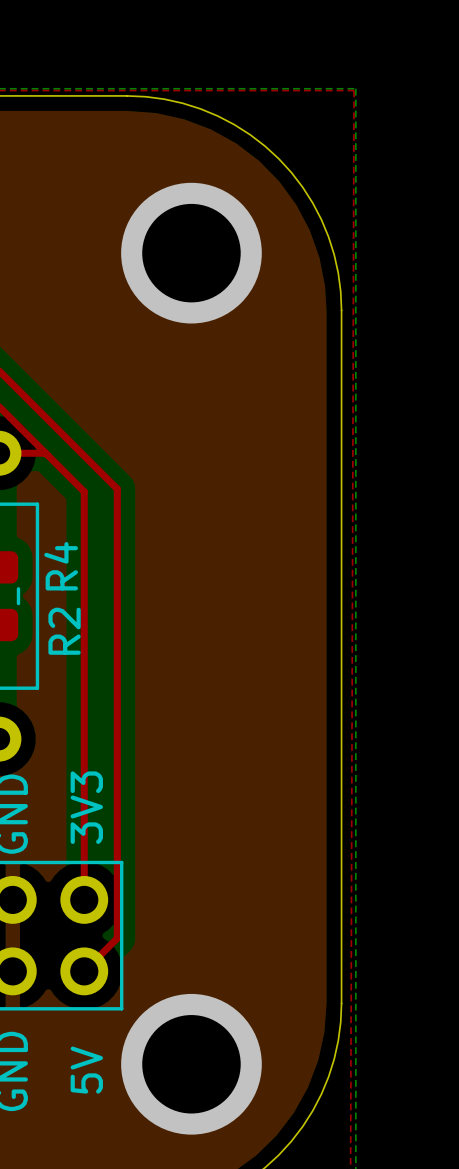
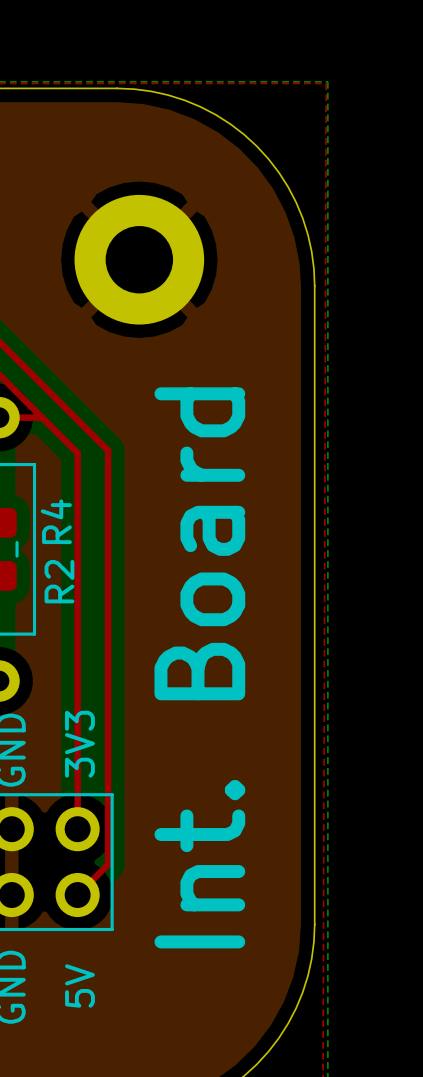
via: (191, 253) -> none
part: none -> (139, 259)
text: none -> Int. Board (199, 667)
via: (191, 1064) -> none

